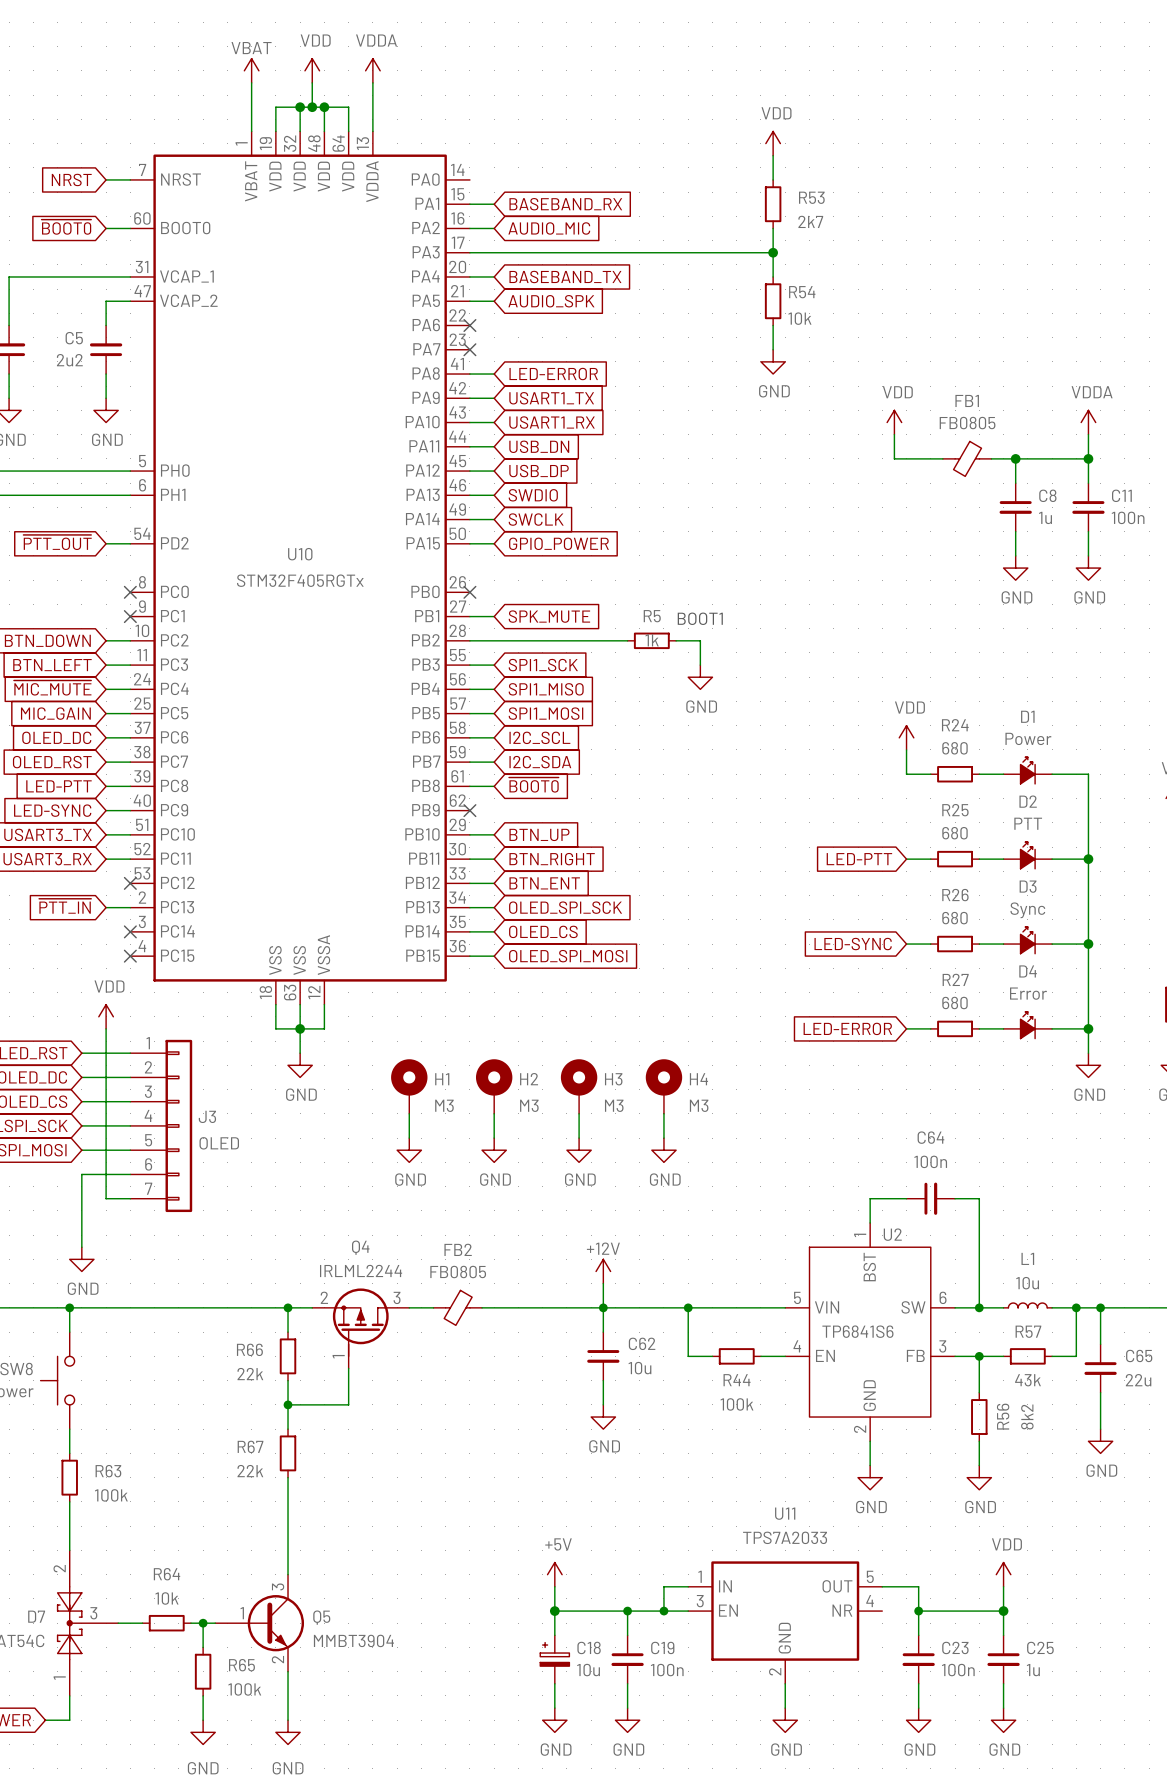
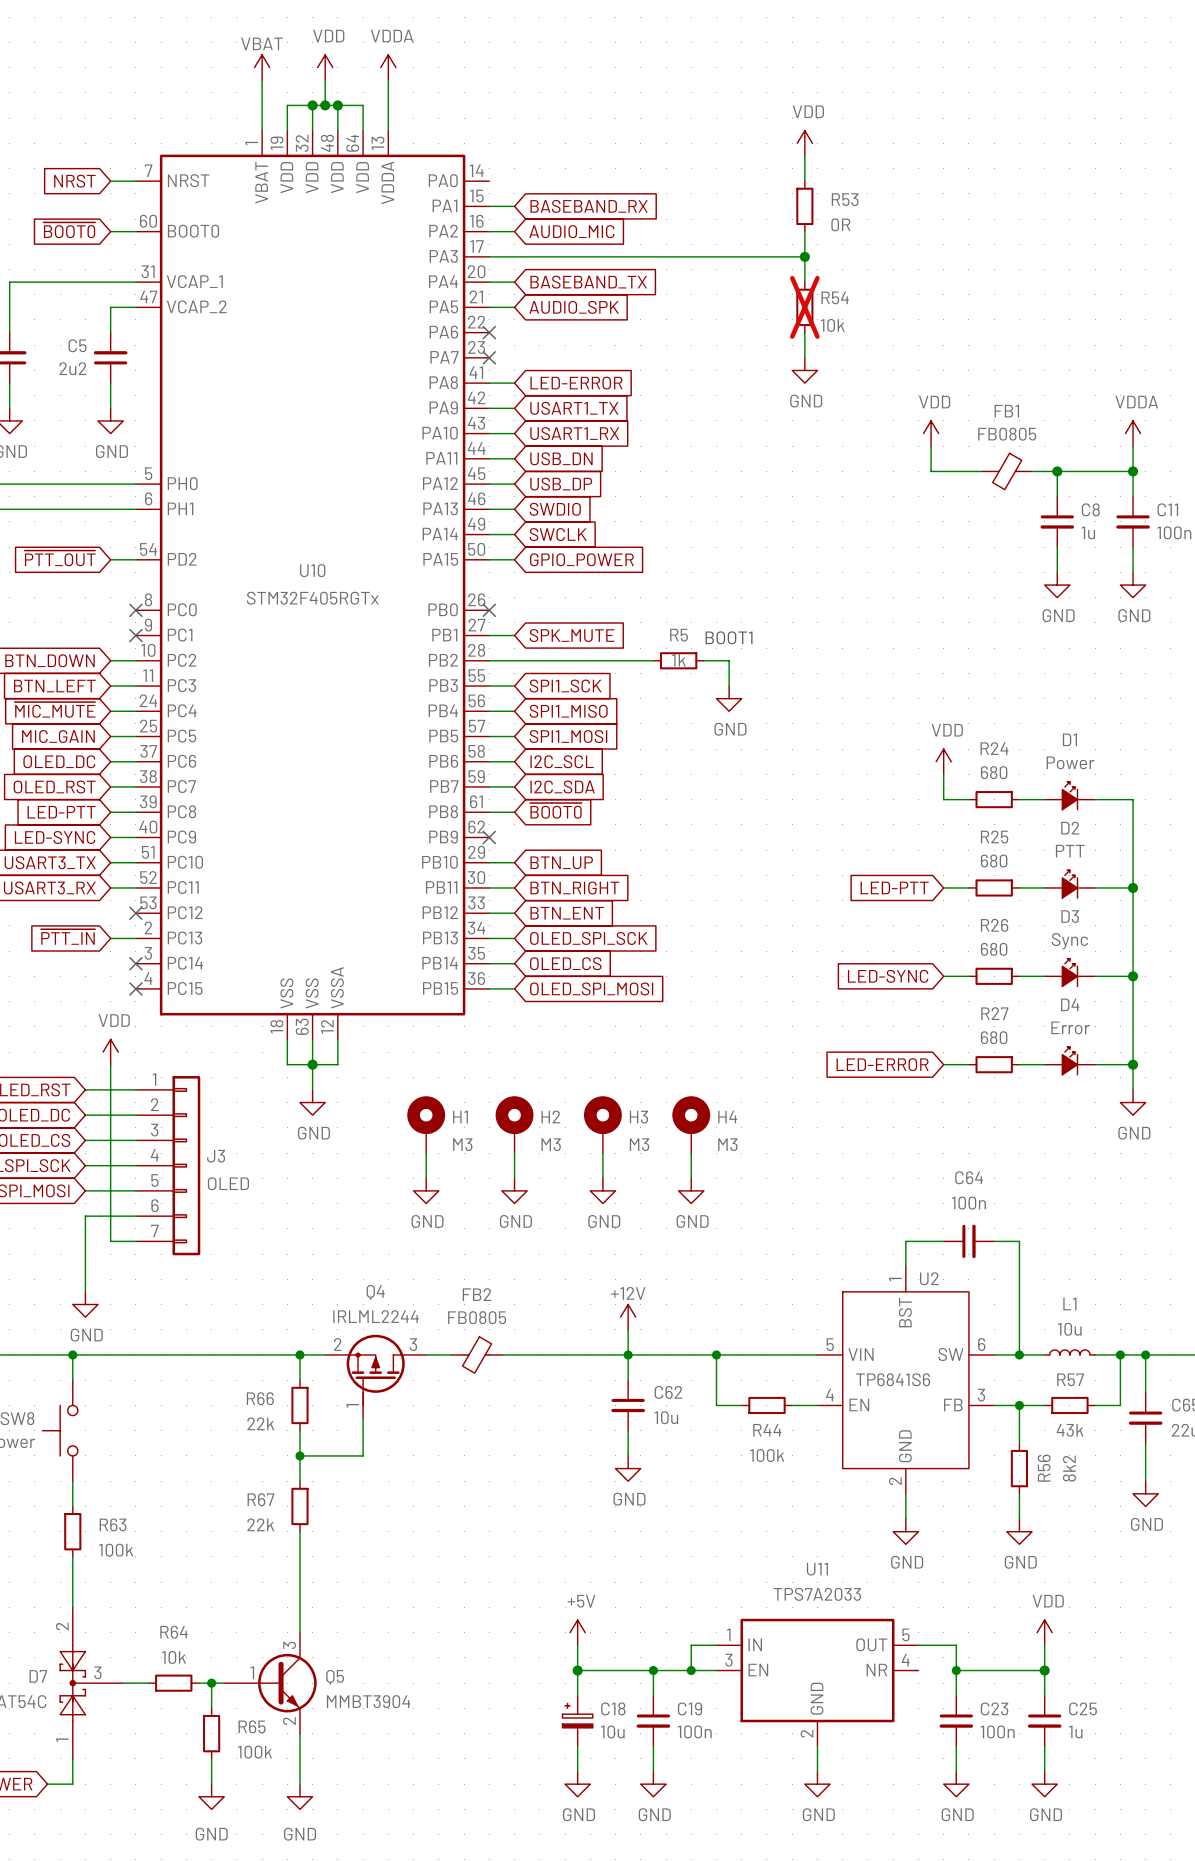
R53 value: 2k7 (810, 221) -> 0R (840, 224)
R54 do-not-place cross: none -> (804, 307)

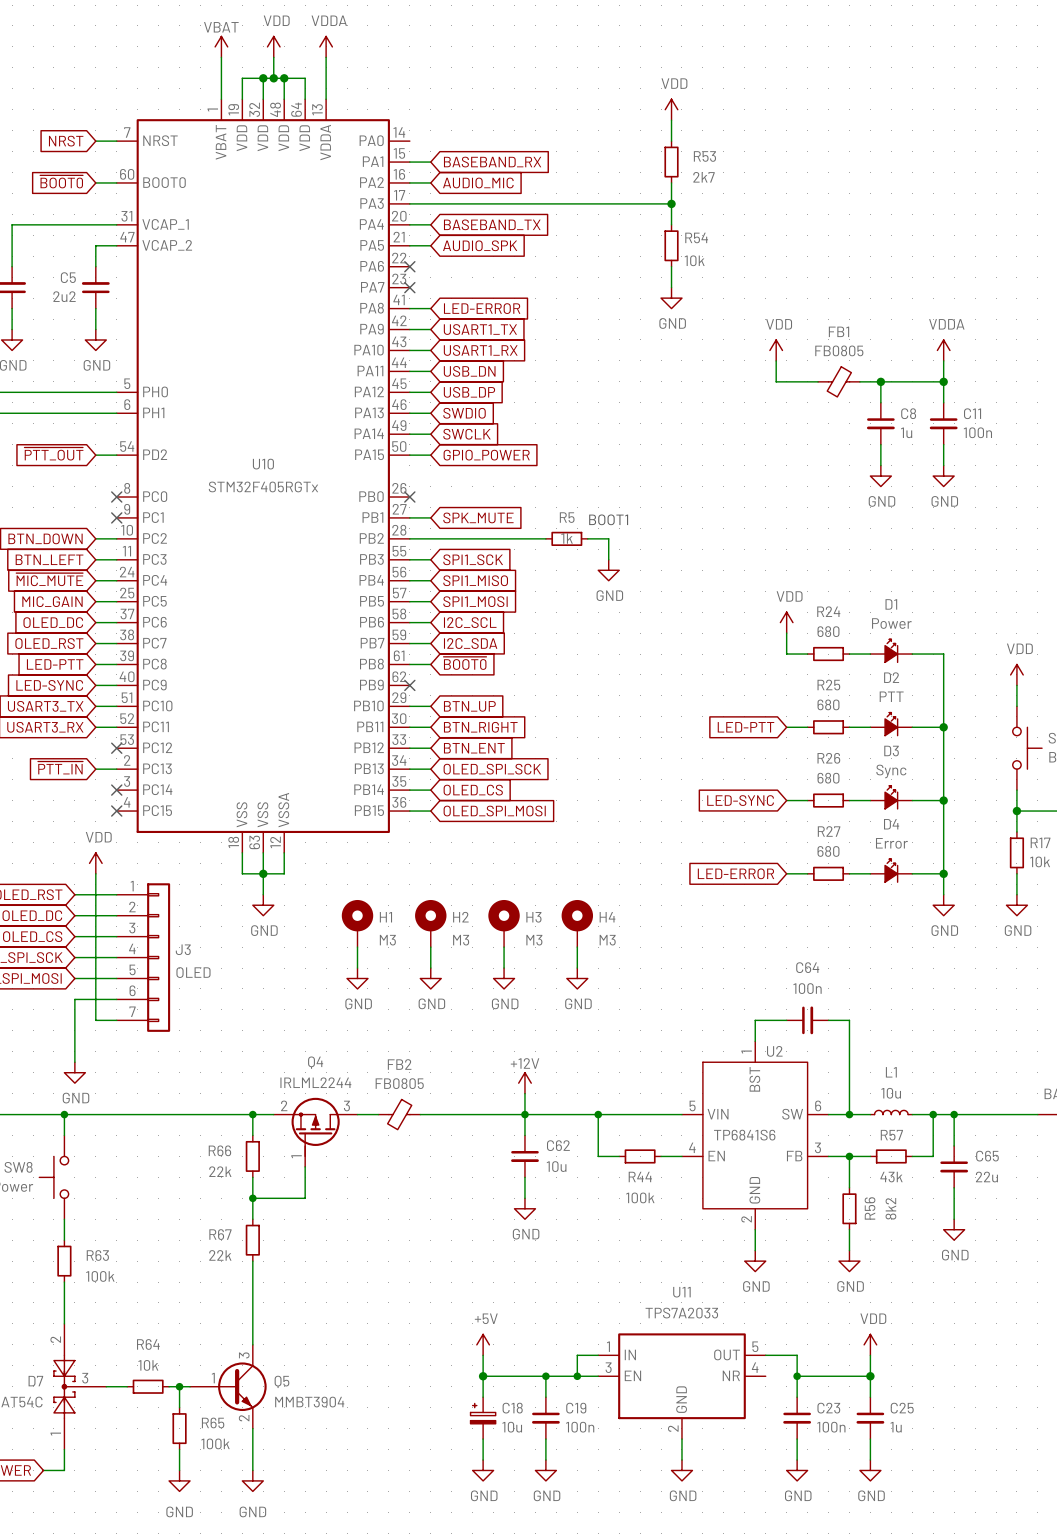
R53 value: 0R (840, 224) -> 2k7 (704, 177)
R54 do-not-place cross: (804, 307) -> none

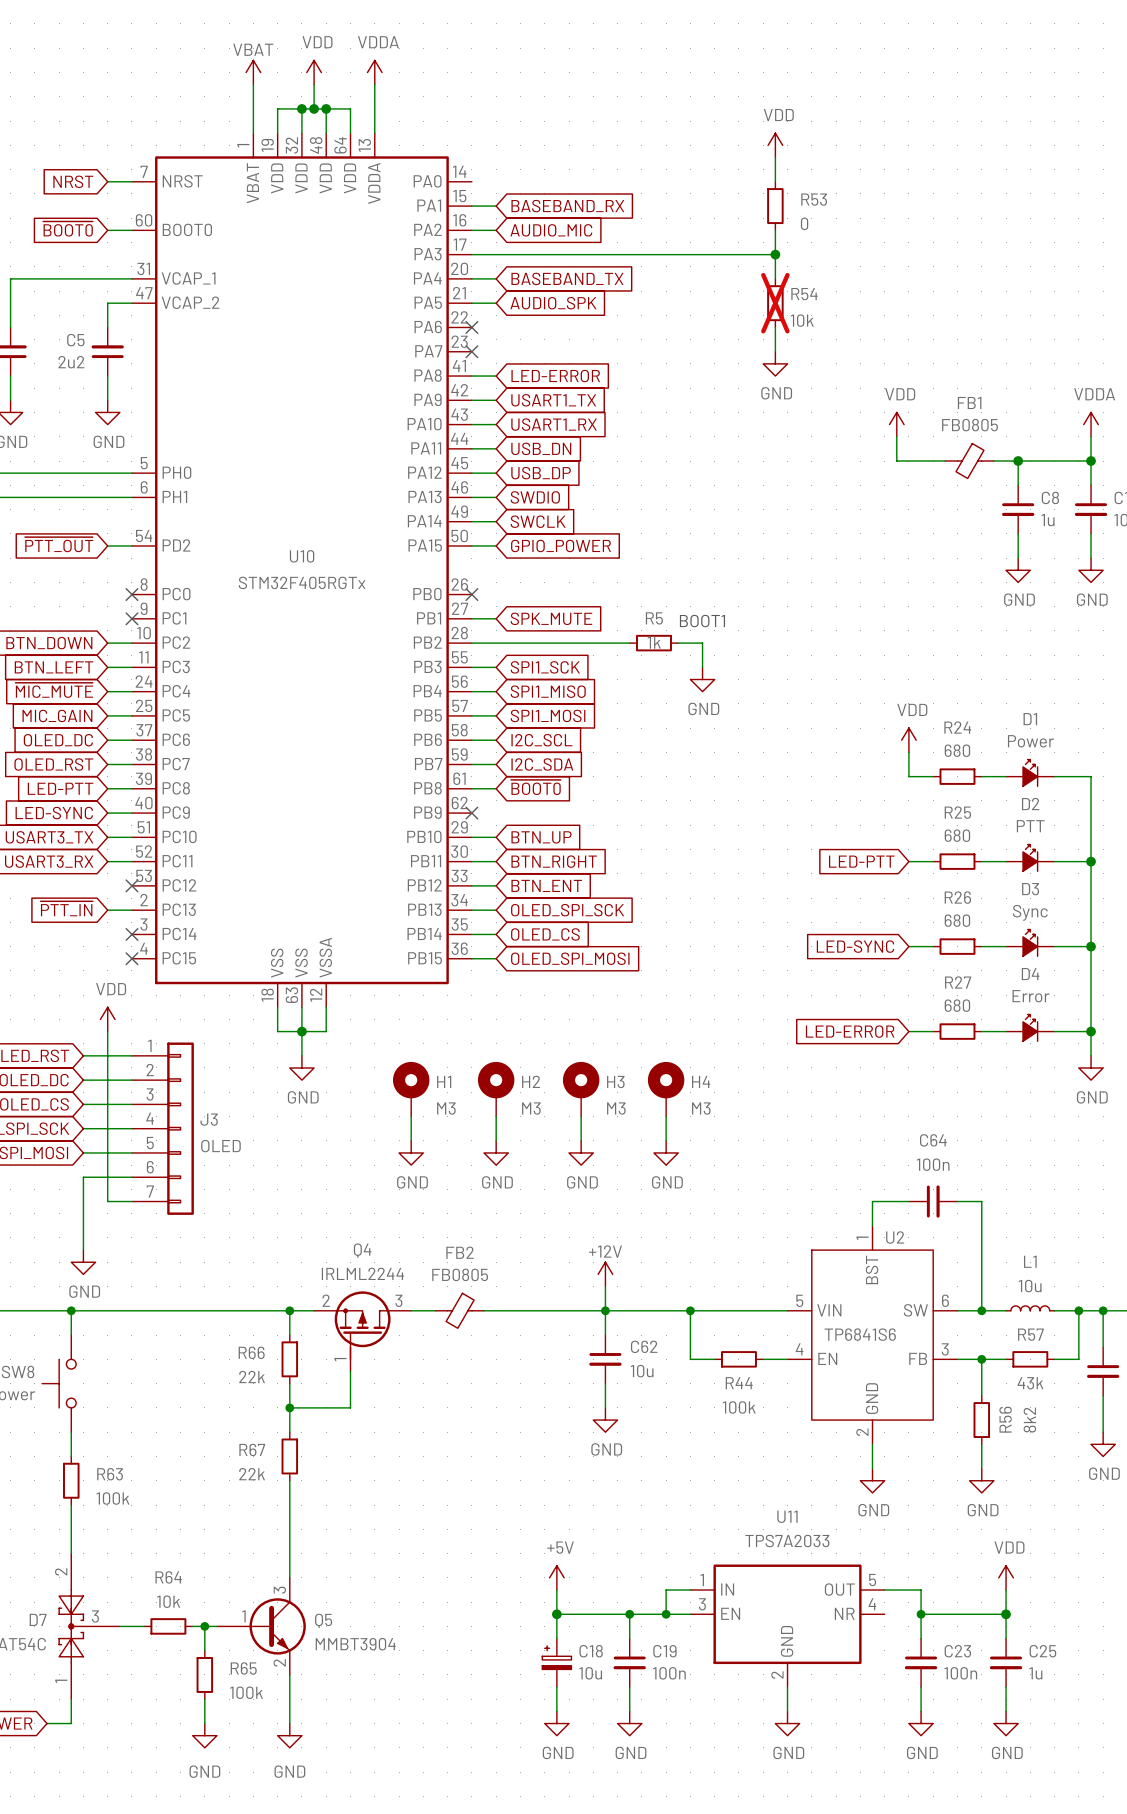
R53 value: 2k7 (704, 177) -> 0 (804, 223)
R54 do-not-place cross: none -> (775, 303)

